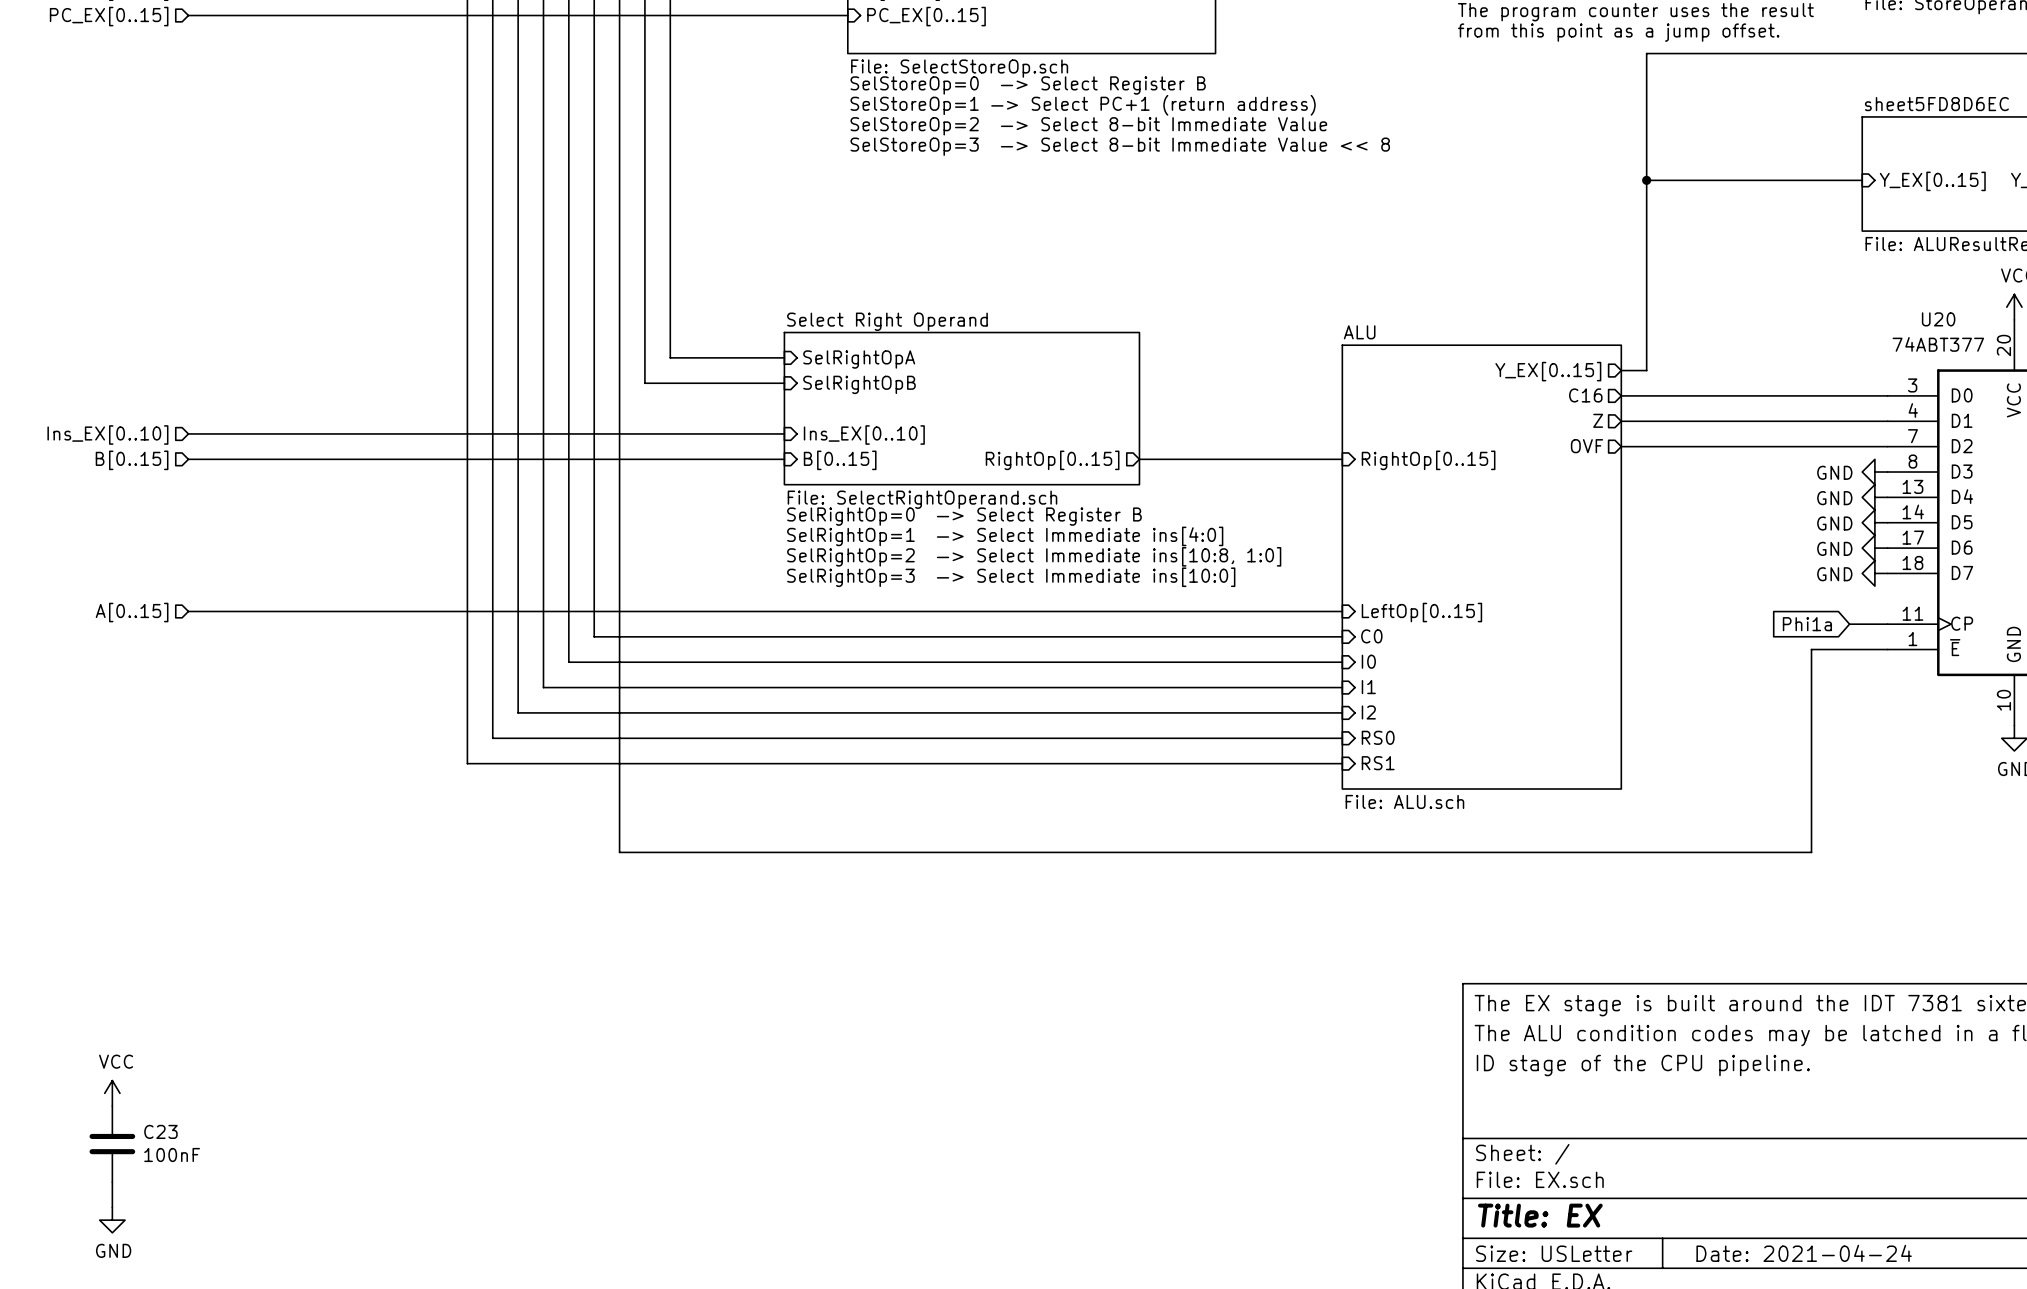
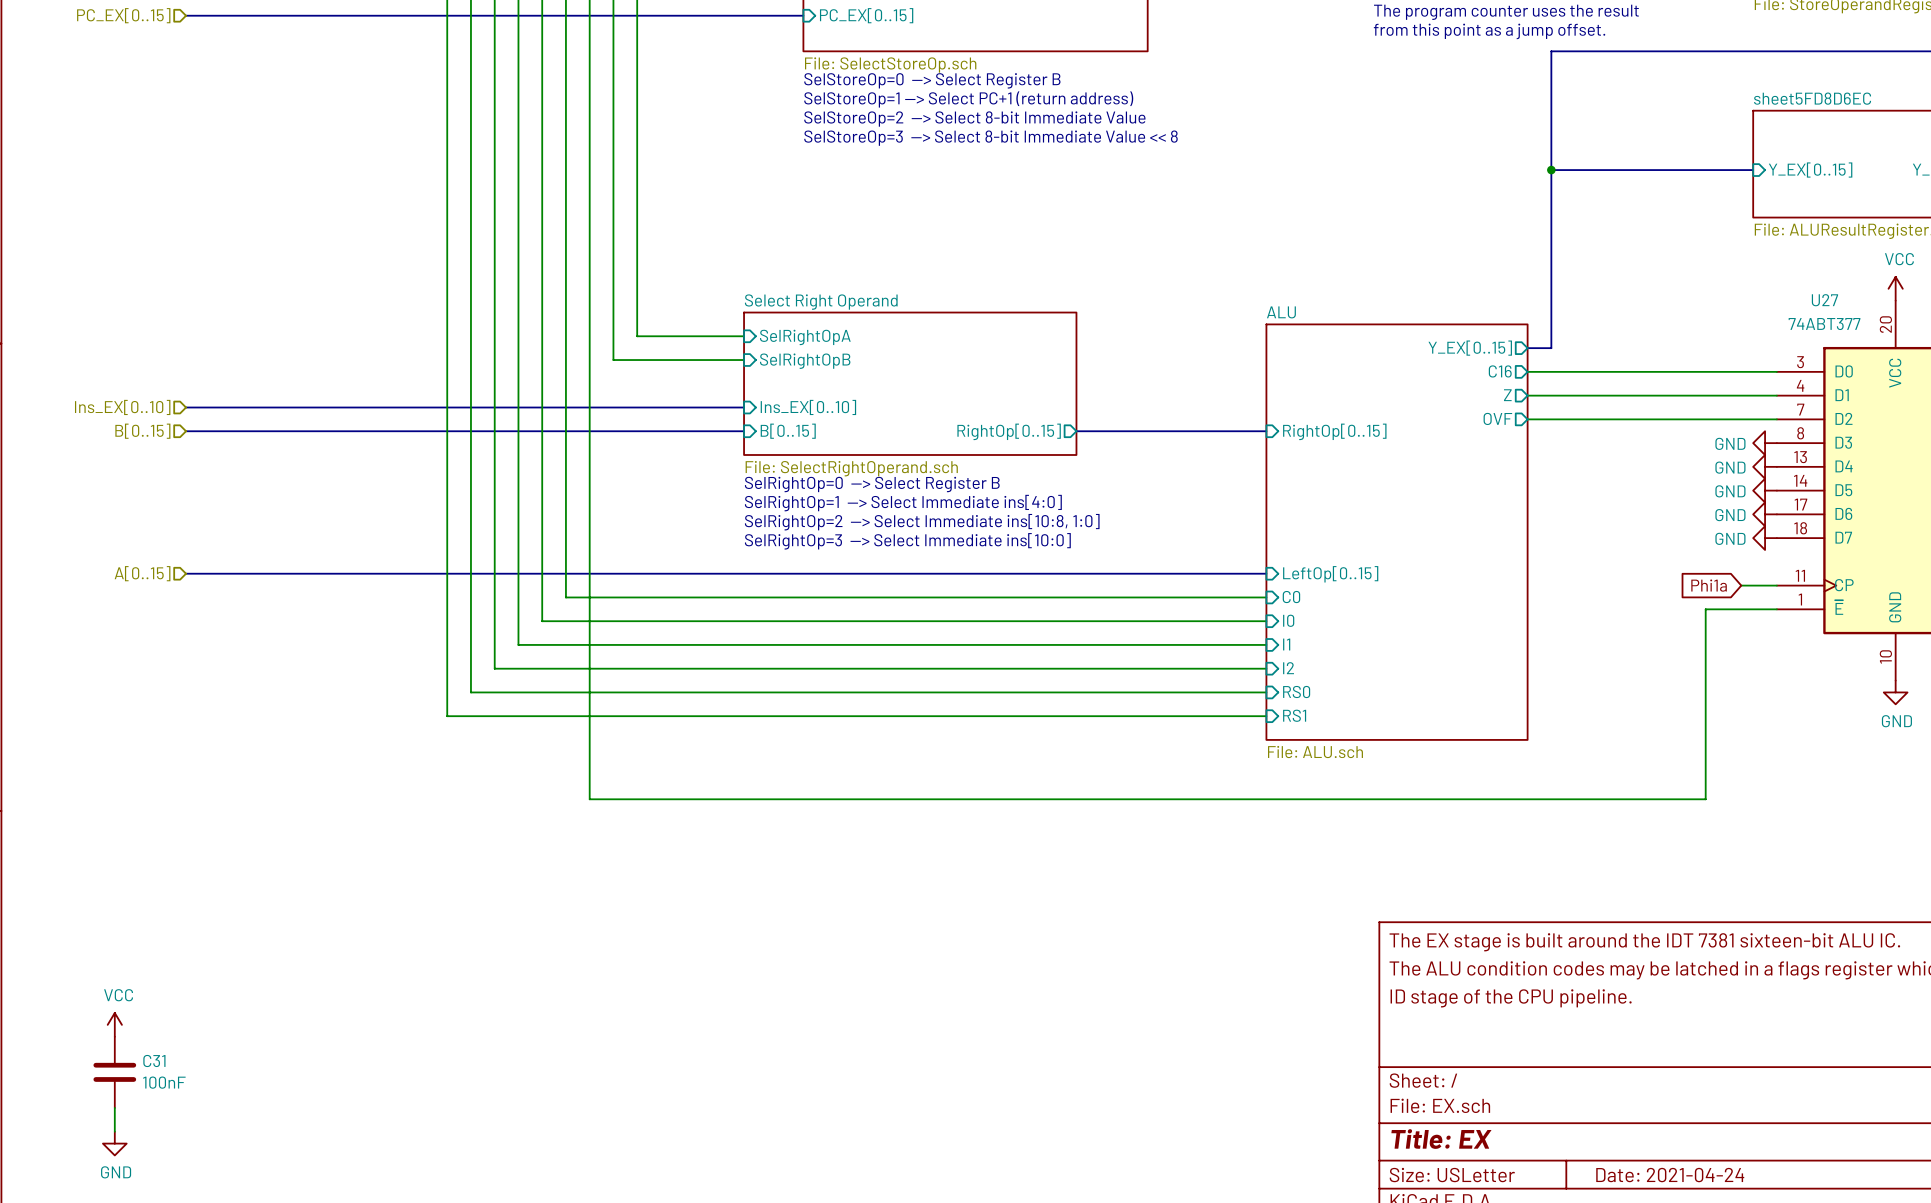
U20 name: U20 (1938, 319) -> U27 (1824, 300)
C23 name: C23 (160, 1131) -> C31 (154, 1061)

